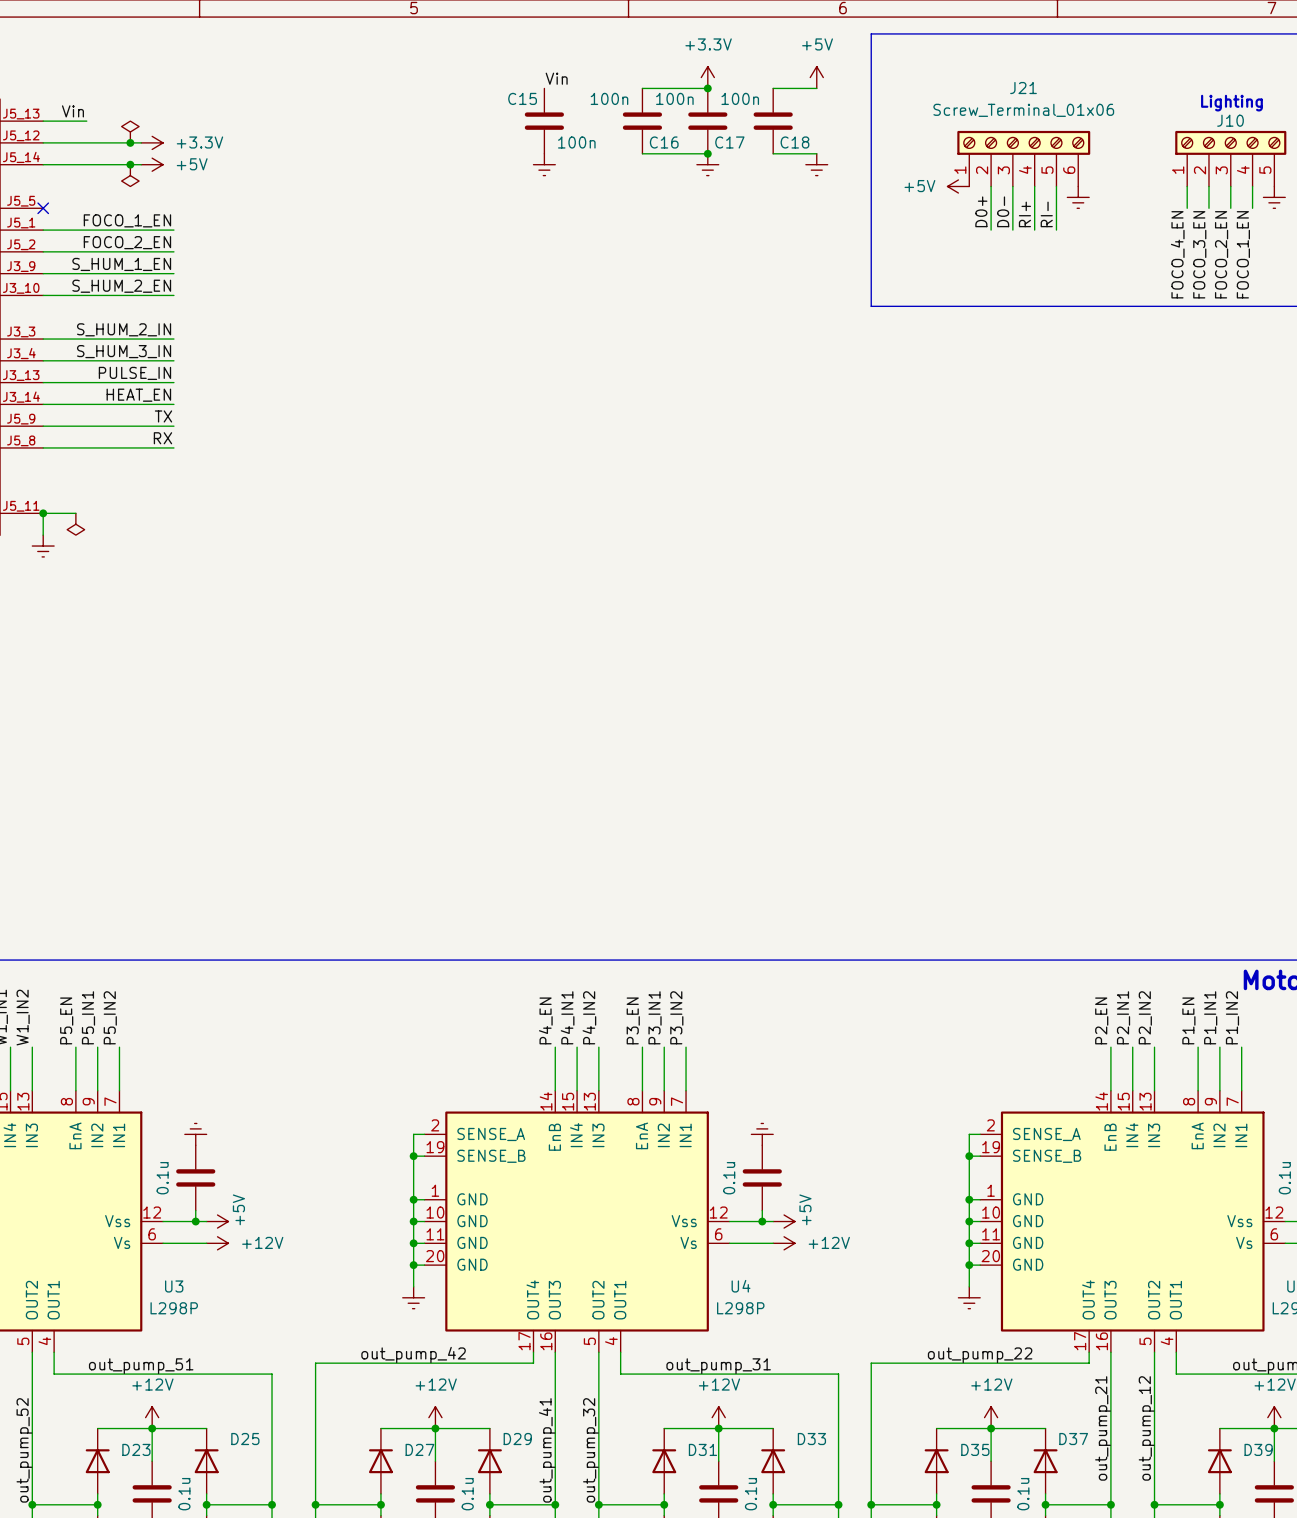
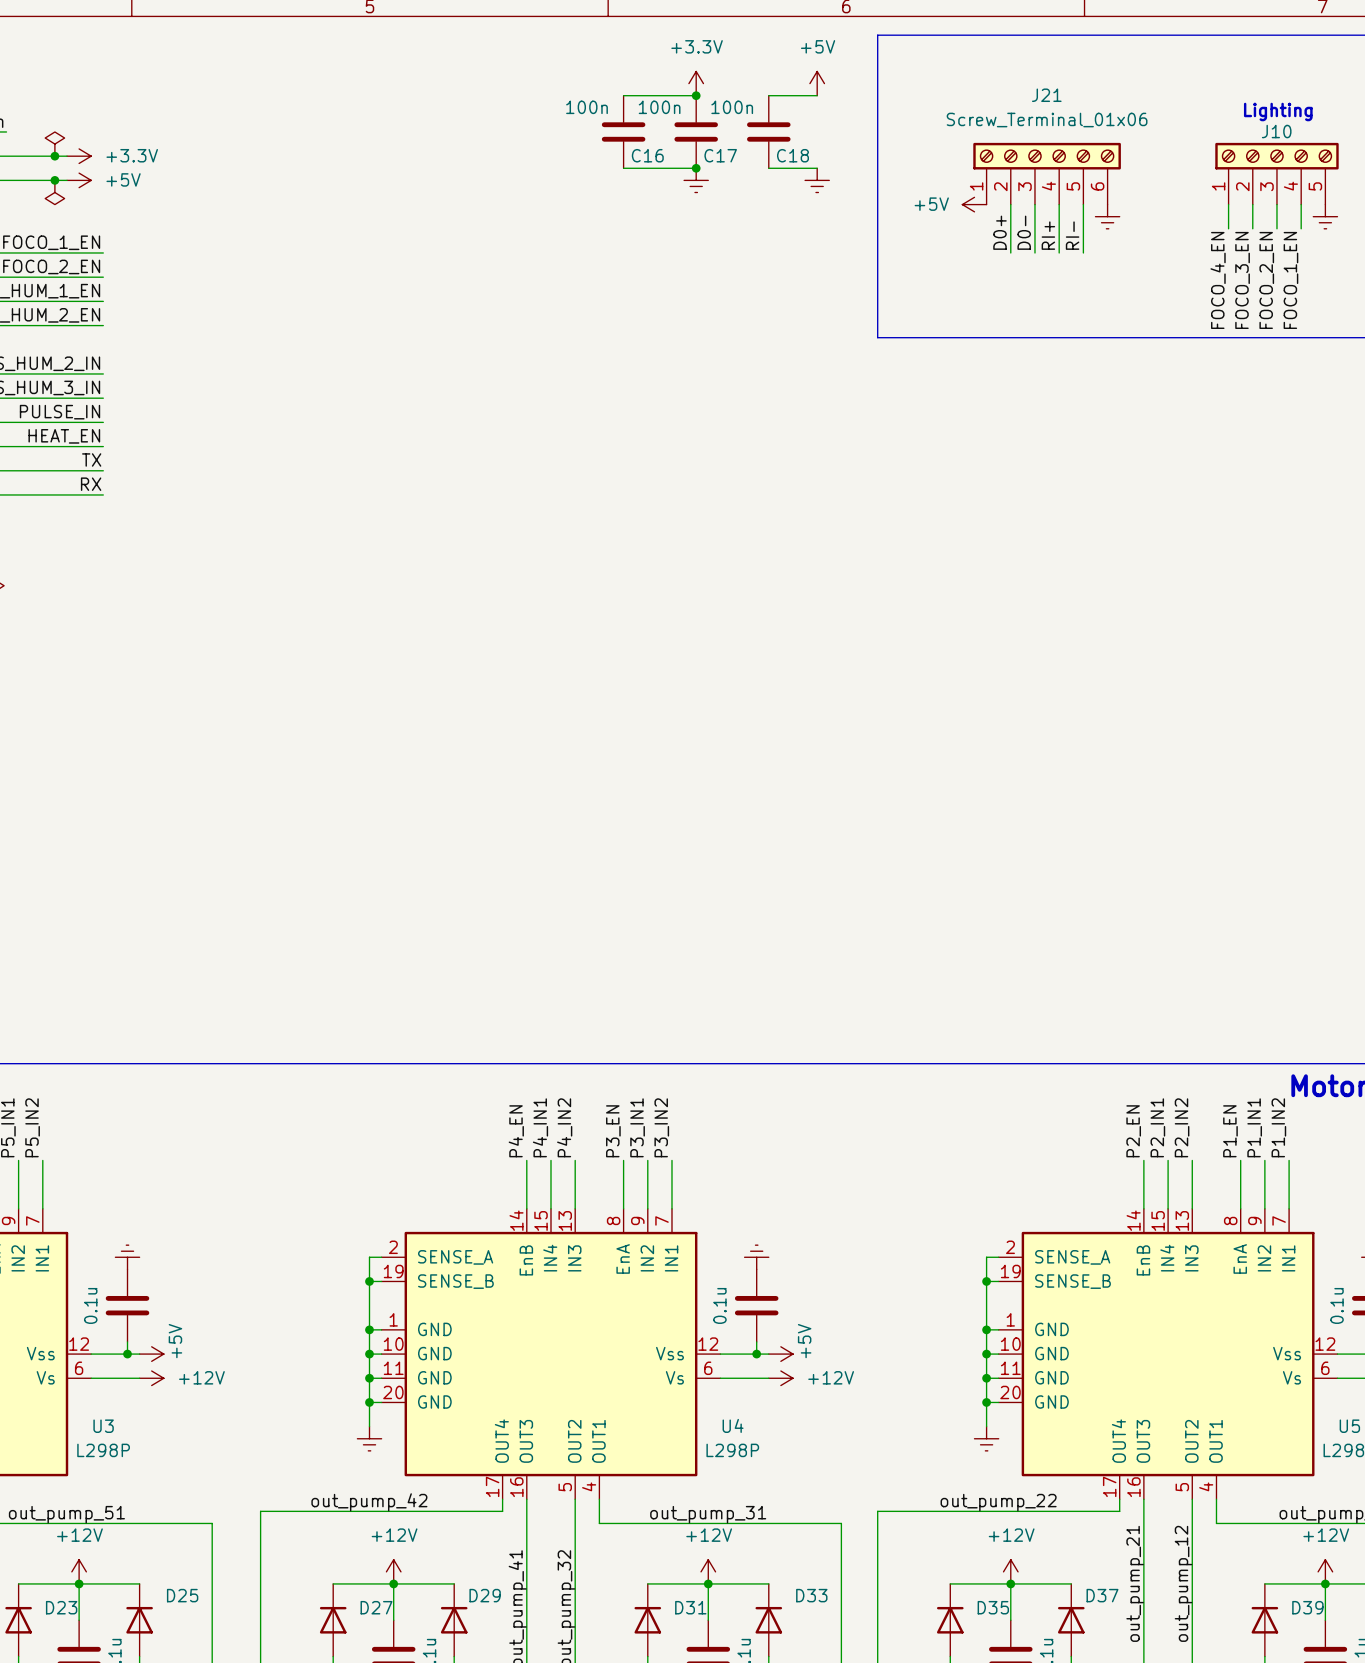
label: Vin (556, 78) -> none
C15: 100n (544, 121) -> none
power symbol: (544, 164) -> none

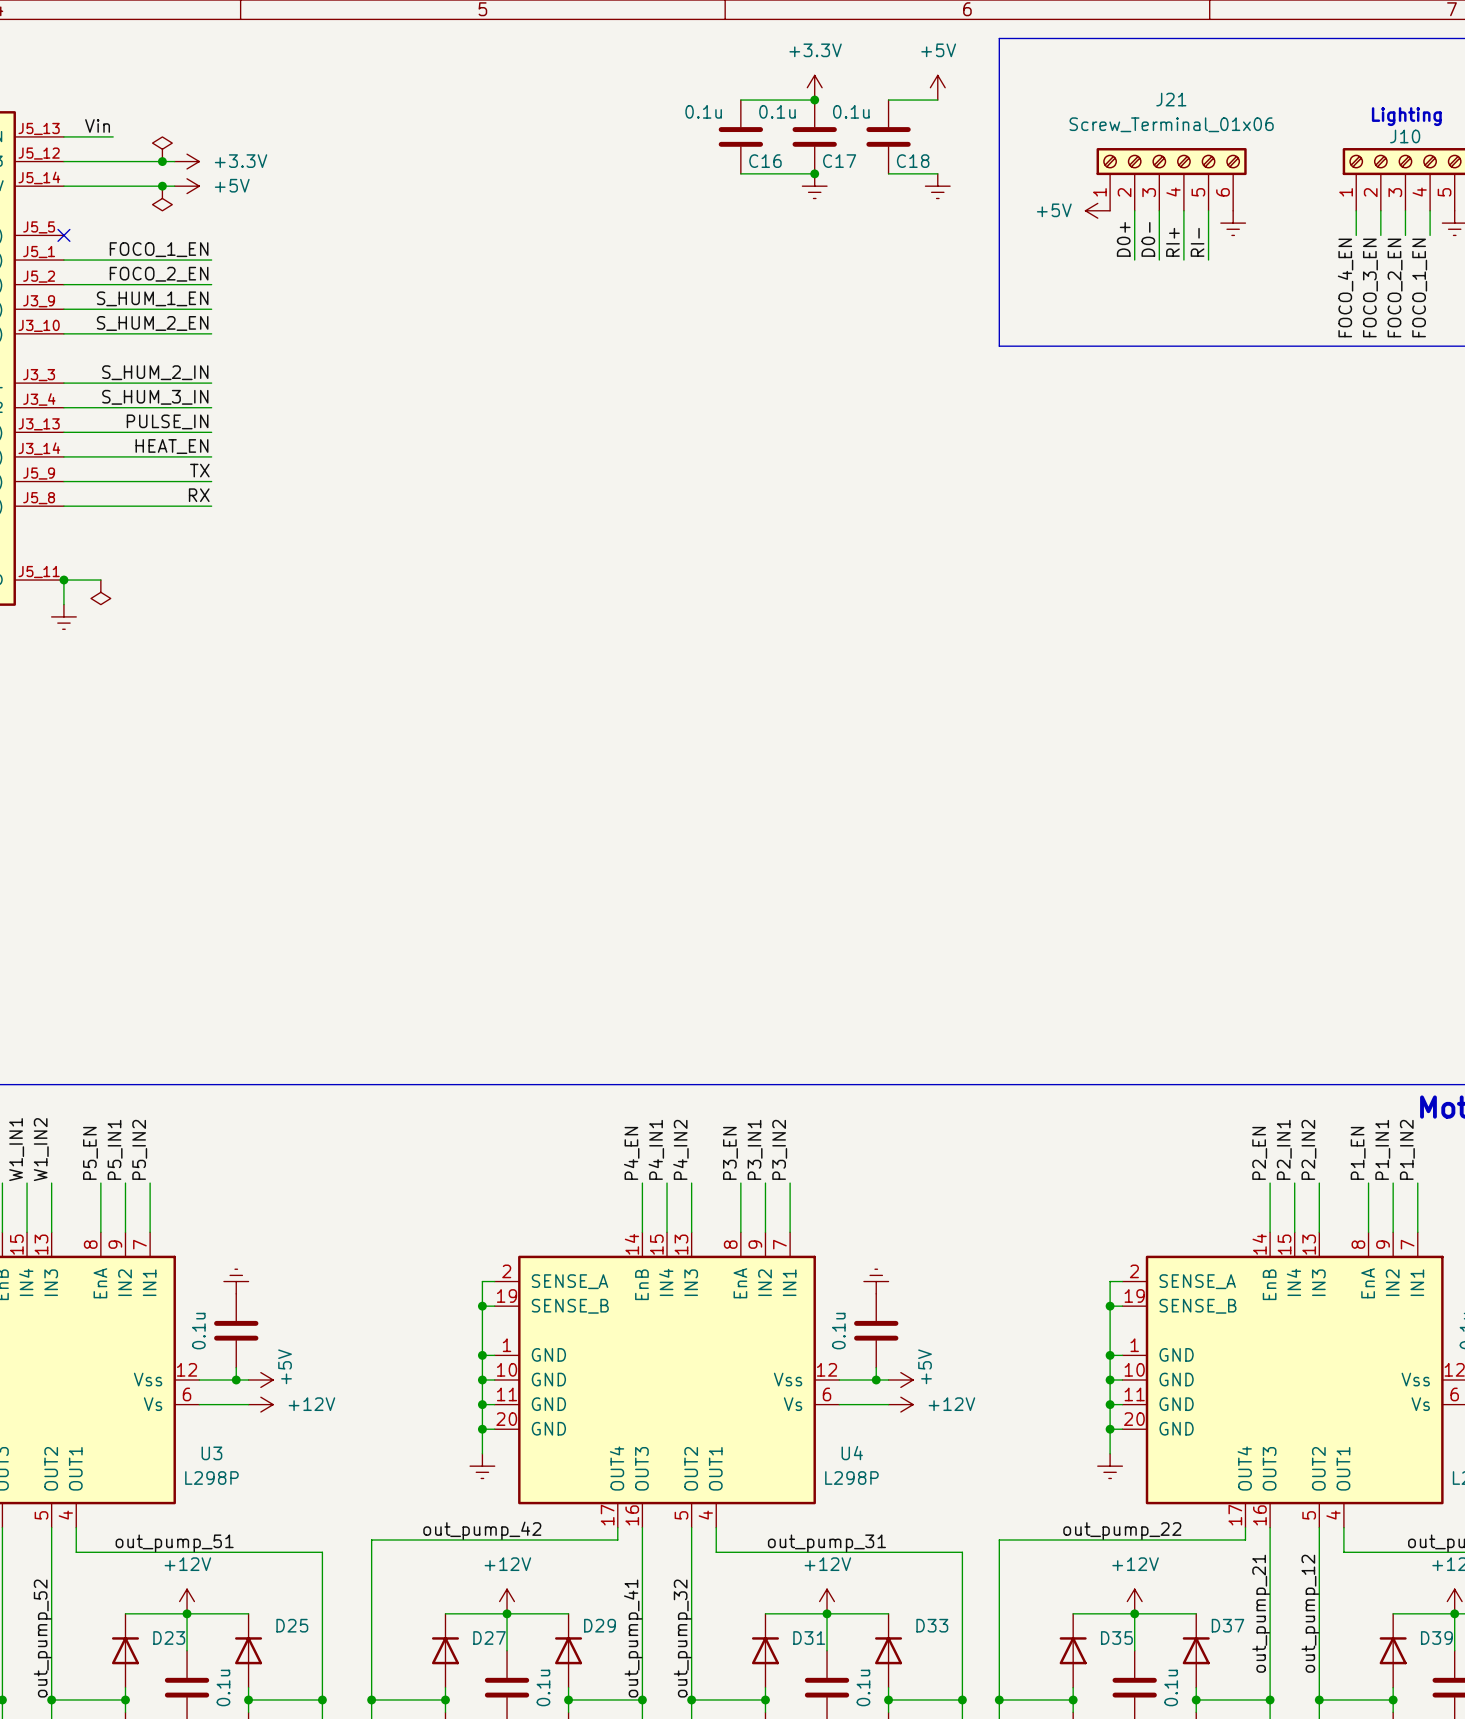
C16 value: 100n (587, 107) -> 0.1u (703, 111)
C17 value: 100n (659, 107) -> 0.1u (777, 111)
C18 value: 100n (732, 107) -> 0.1u (851, 111)

